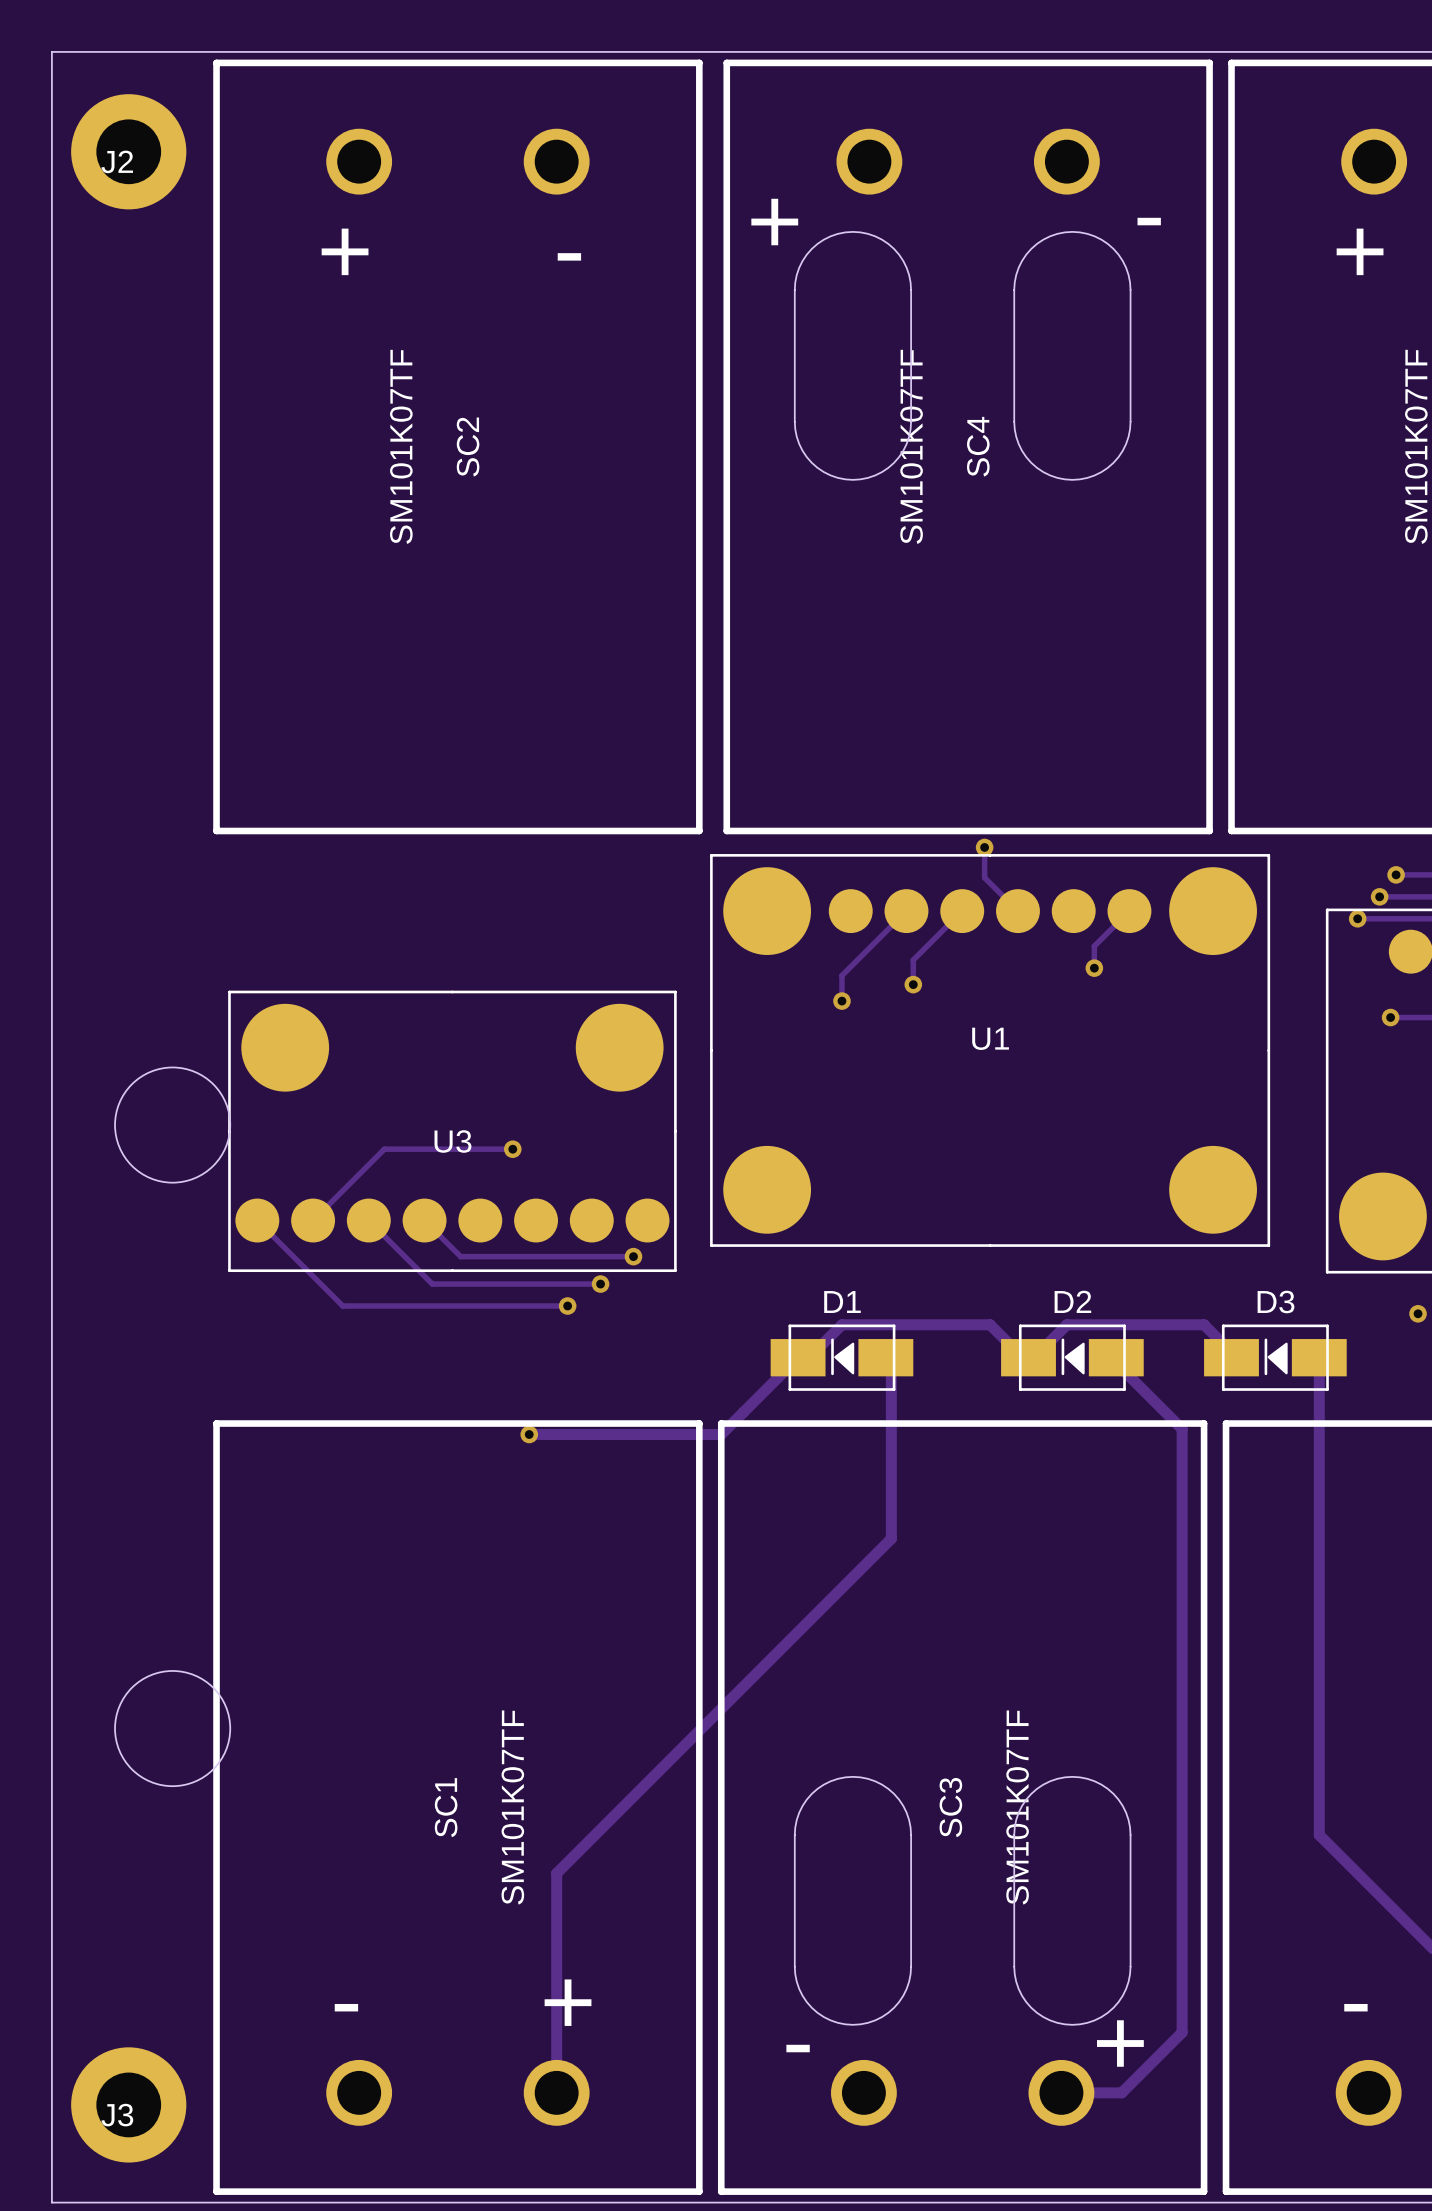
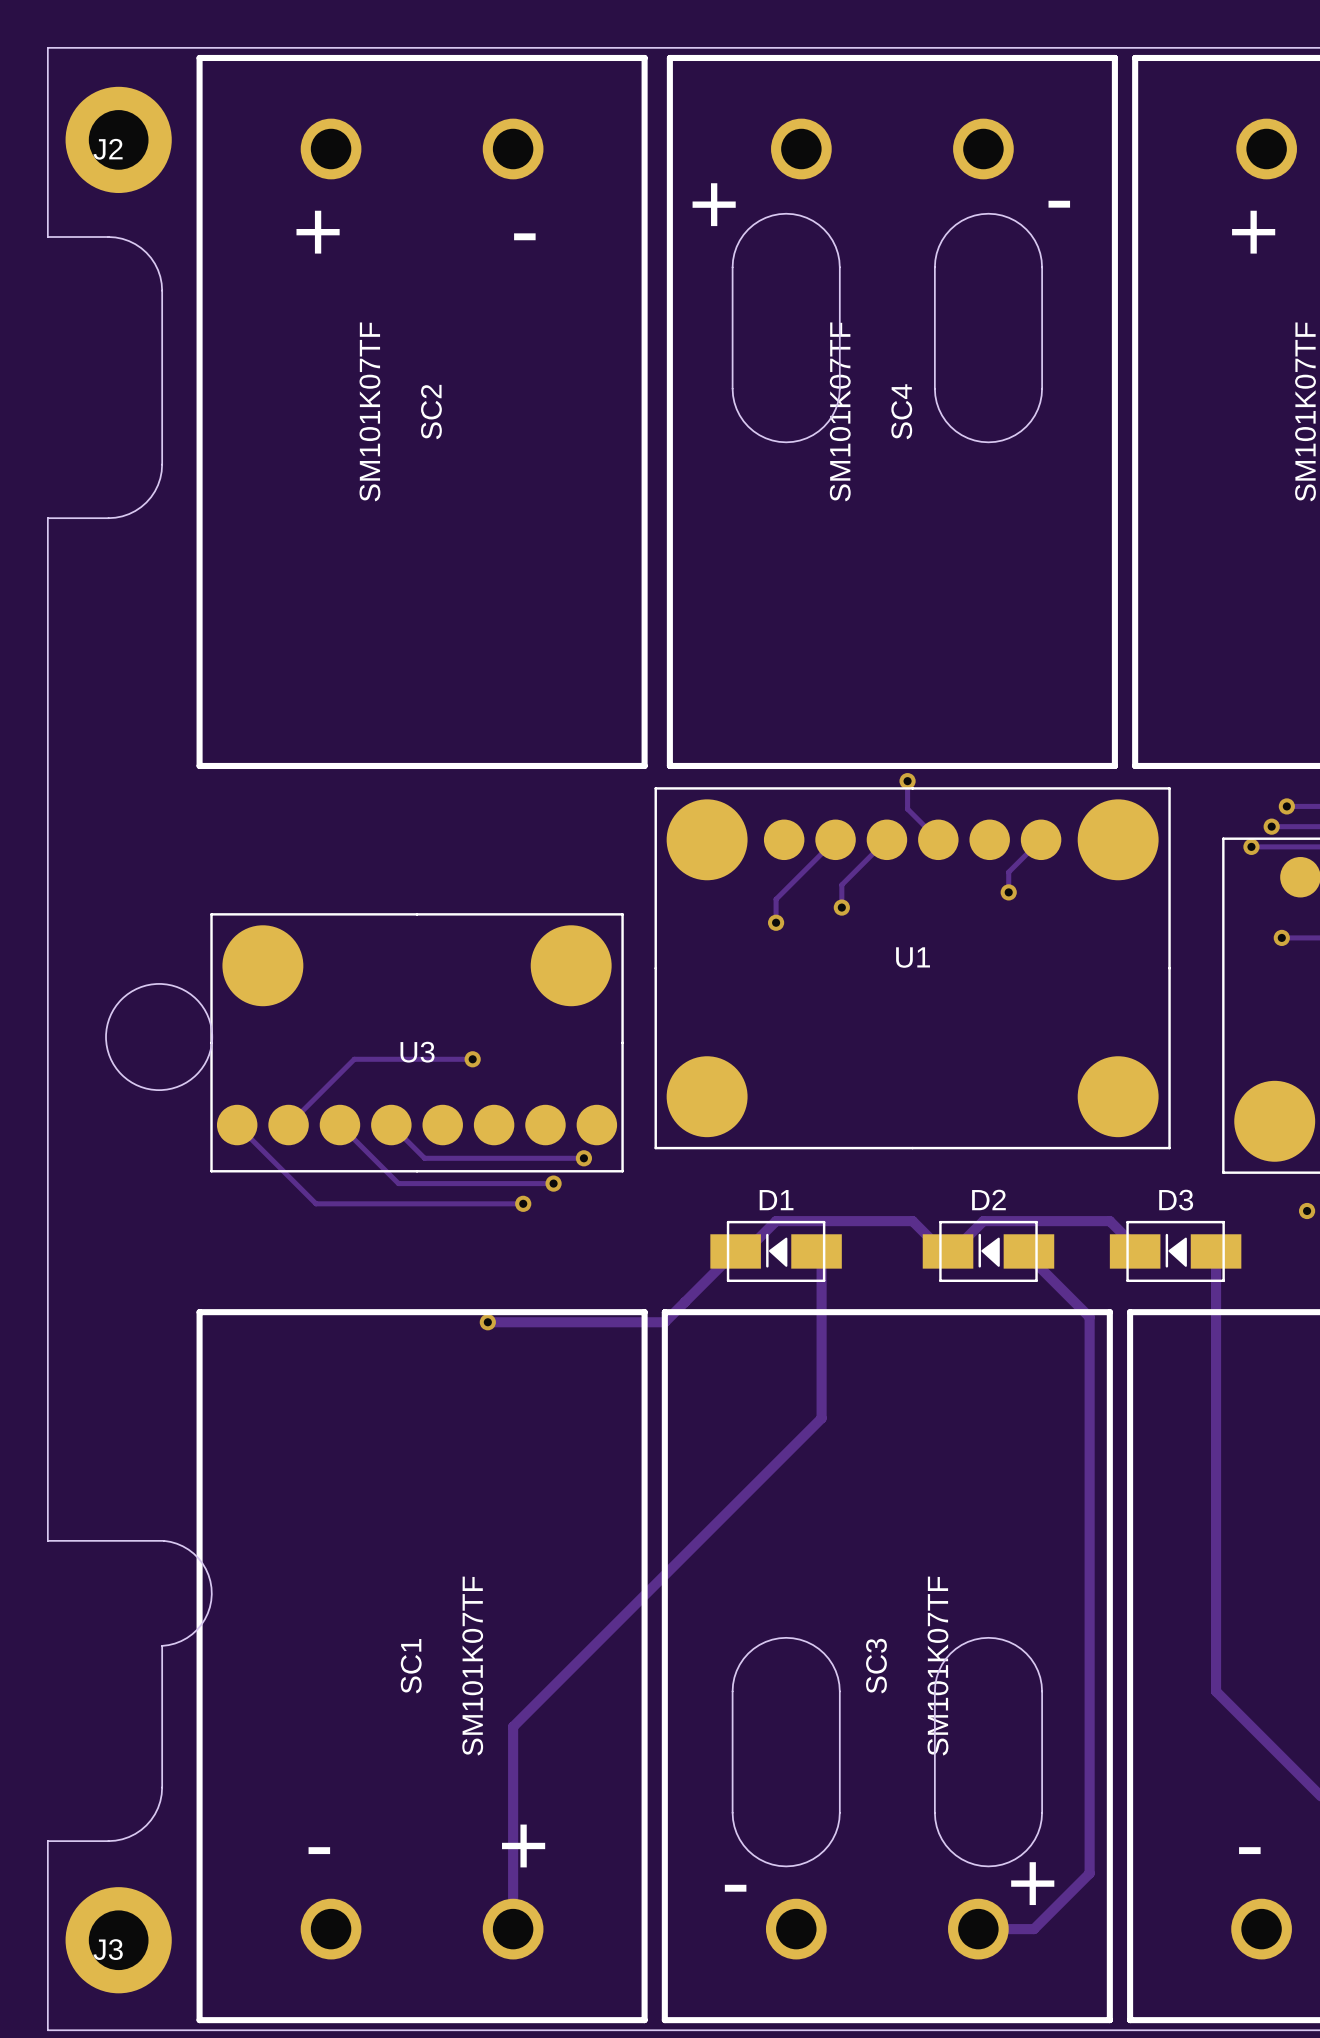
board edge: (51, 257) (51, 562) -> (47, 237) (108, 237) (129, 241) (141, 248) (154, 263) (160, 276) (162, 290) (162, 464) (160, 478) (154, 491) (141, 507) (122, 516) (47, 518)
round board edge: [114, 1670, 231, 1787] -> none
board edge: (51, 1671) (51, 1997) -> (47, 1540) (164, 1540) (176, 1543) (188, 1549) (202, 1563) (210, 1581) (211, 1594) (207, 1613) (197, 1629) (181, 1641) (162, 1645) (162, 1787) (160, 1801) (154, 1814) (141, 1830) (122, 1839) (47, 1841)

